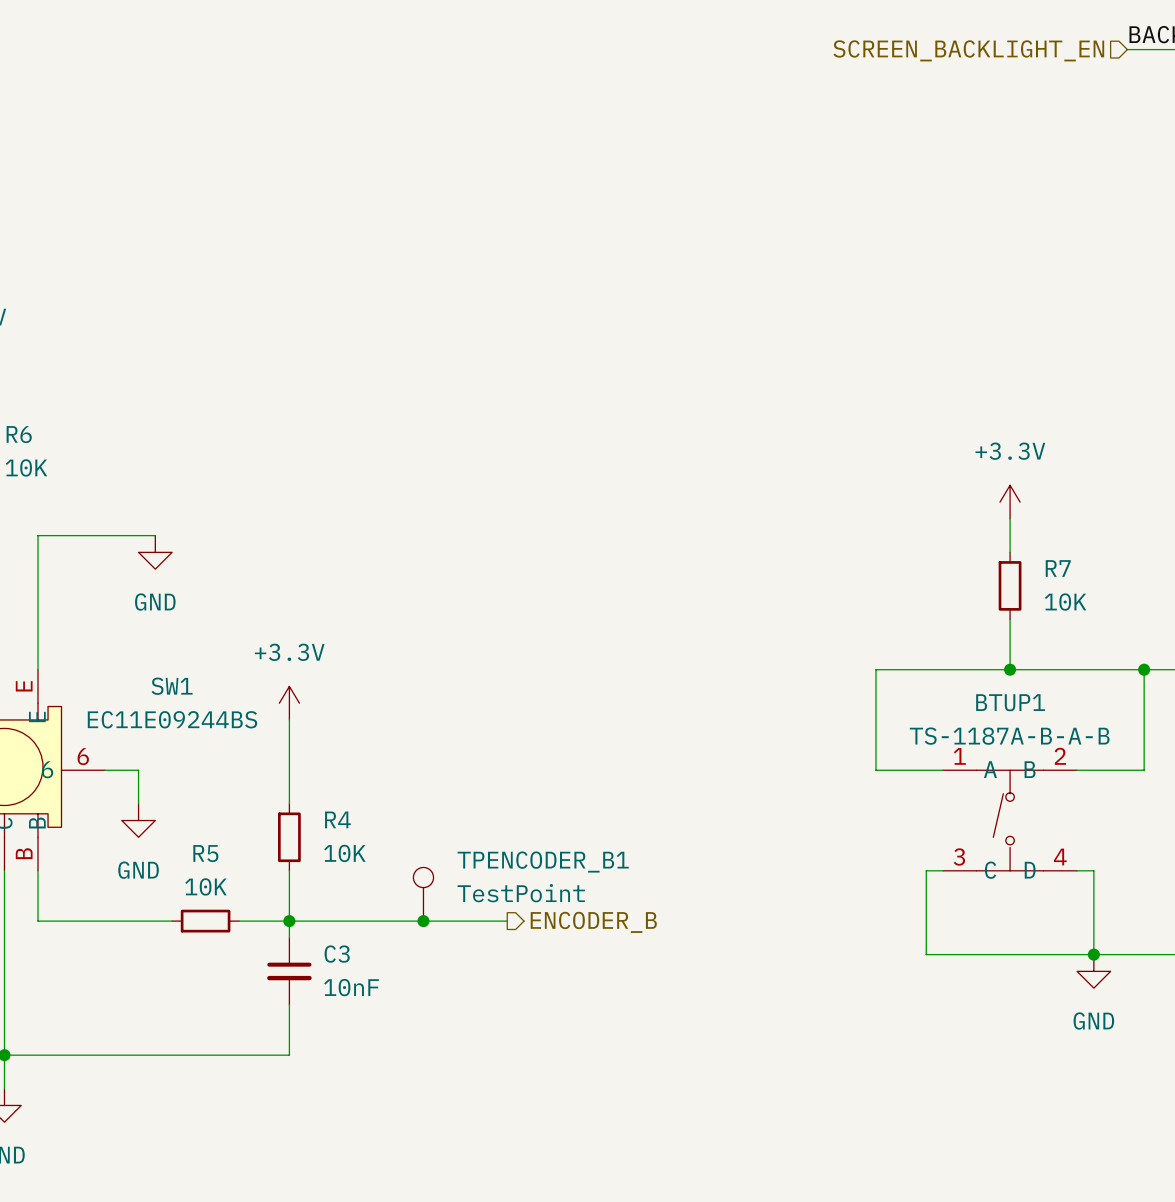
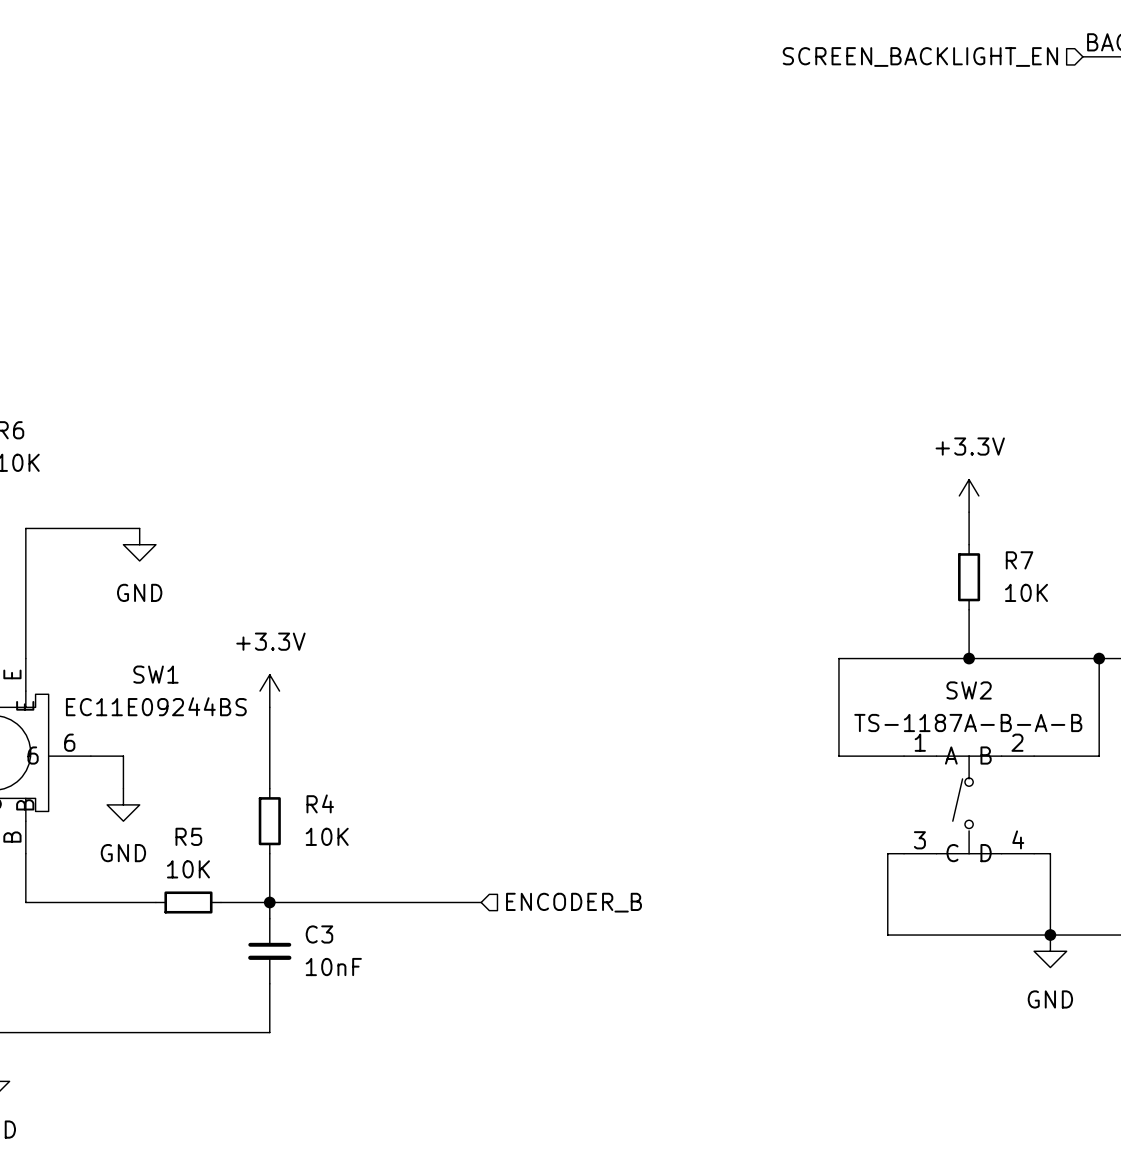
BTUP1 name: BTUP1 (1010, 702) -> SW2 (969, 690)
TPENCODER_B1: TestPoint (423, 894) -> none
junction: (423, 921) -> none
hierarchical label shape: output (593, 922) -> input (573, 902)

